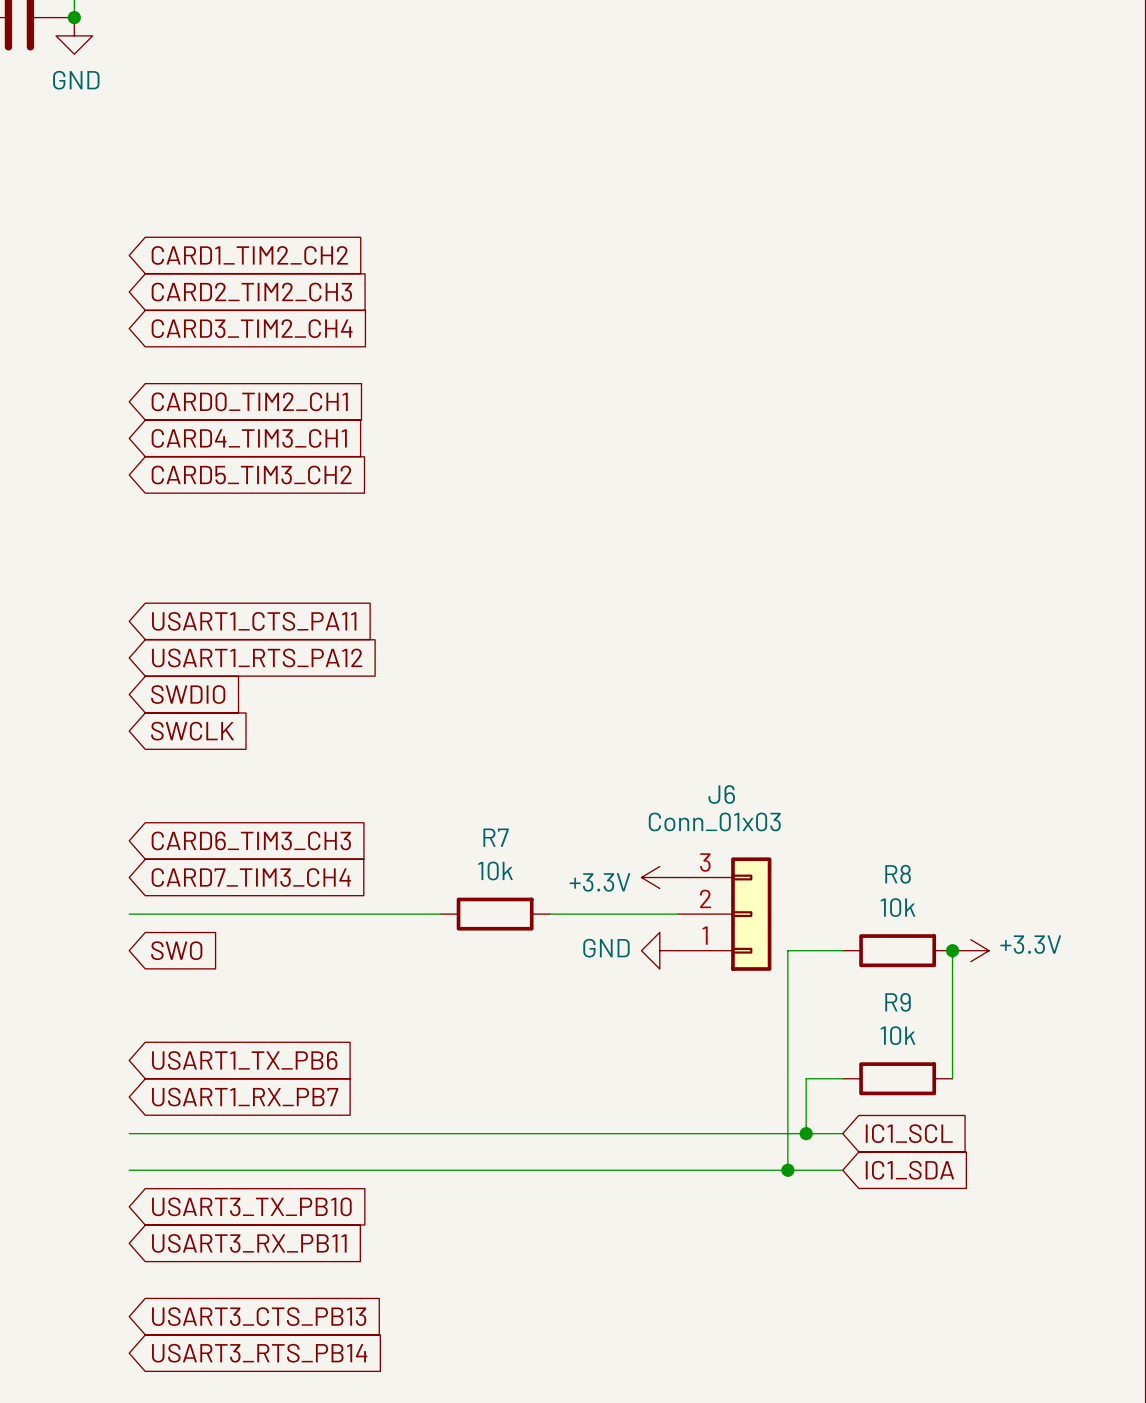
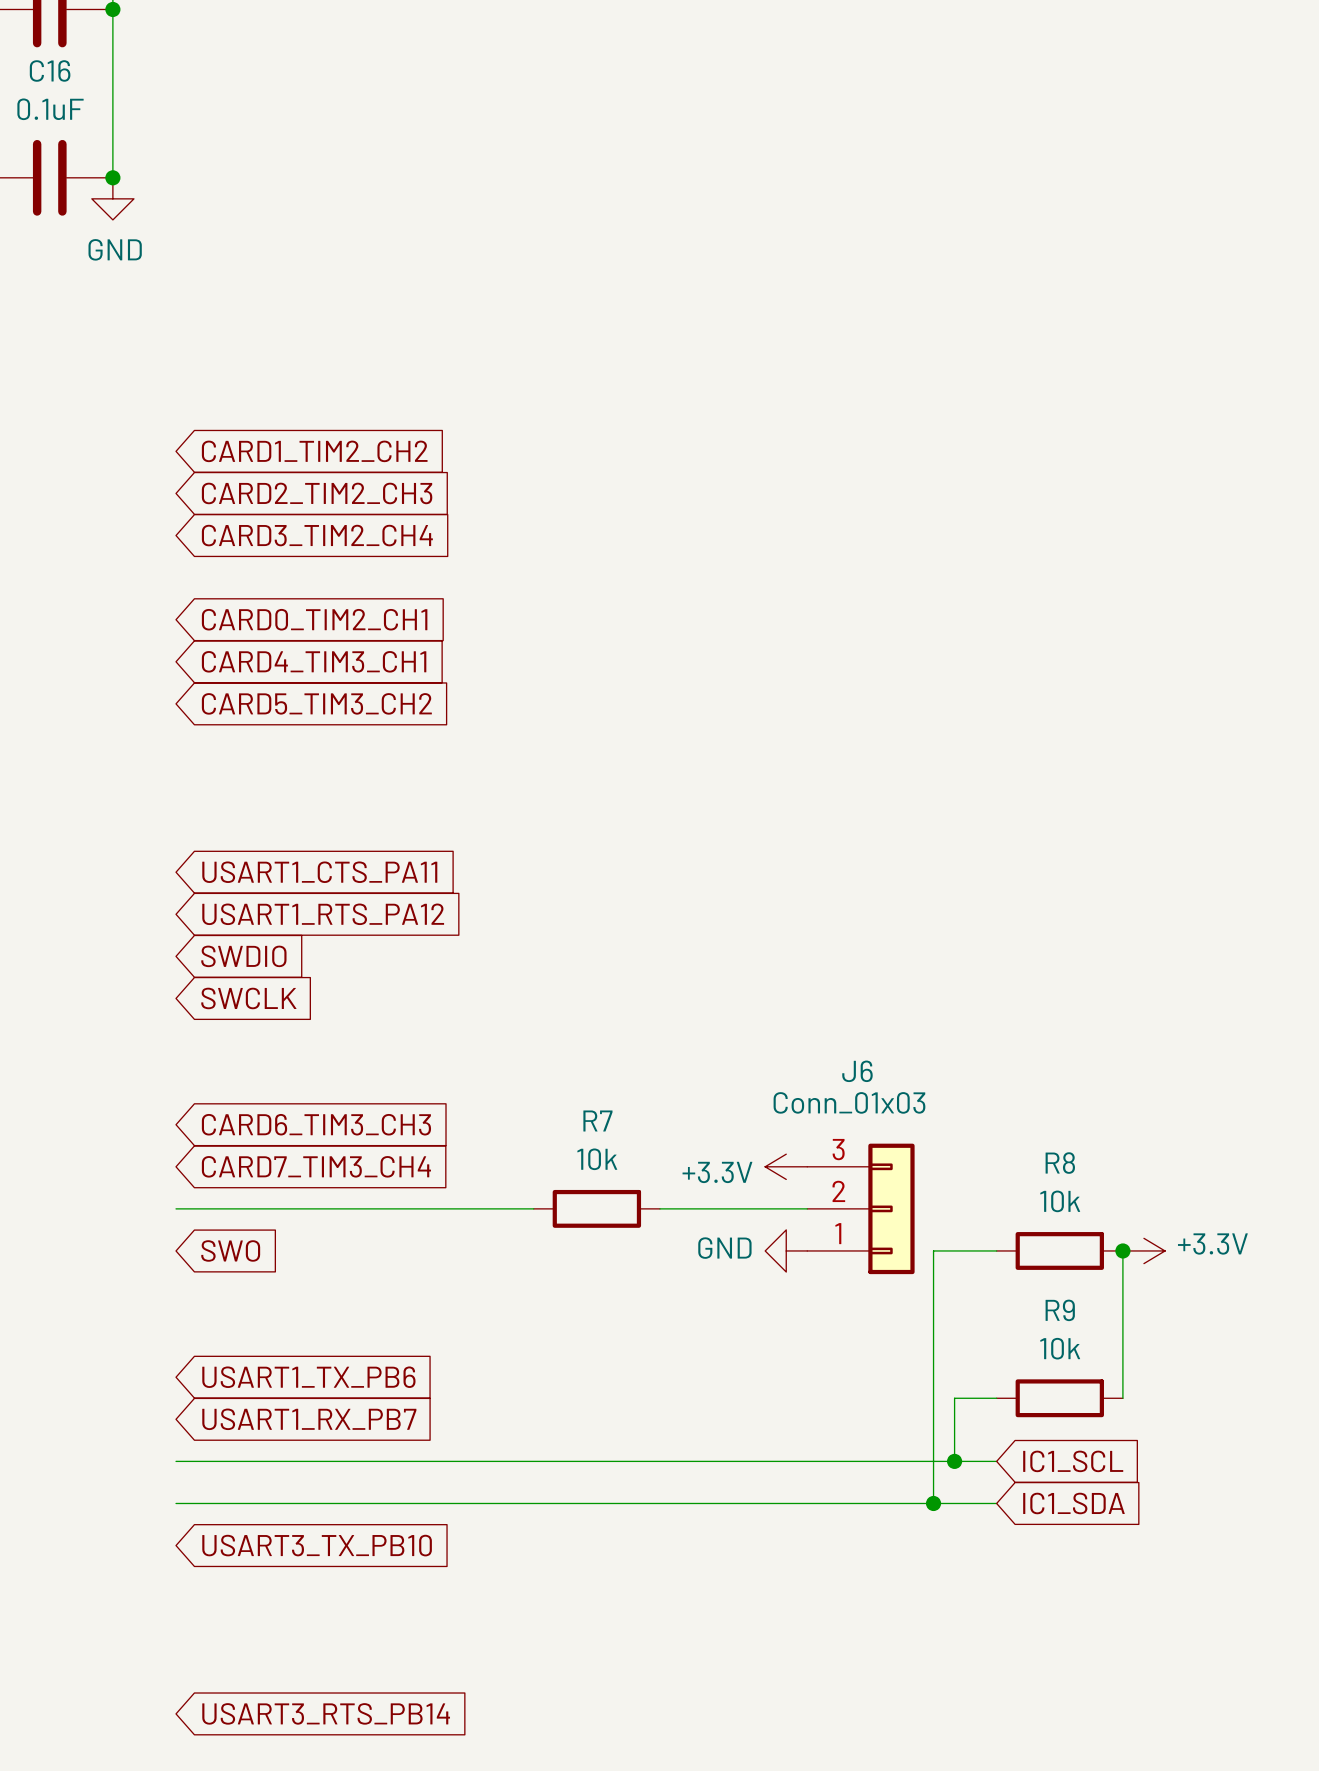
global label: USART3_RX_PB11 (249, 1243) -> none
global label: USART3_CTS_PB13 (259, 1316) -> none

